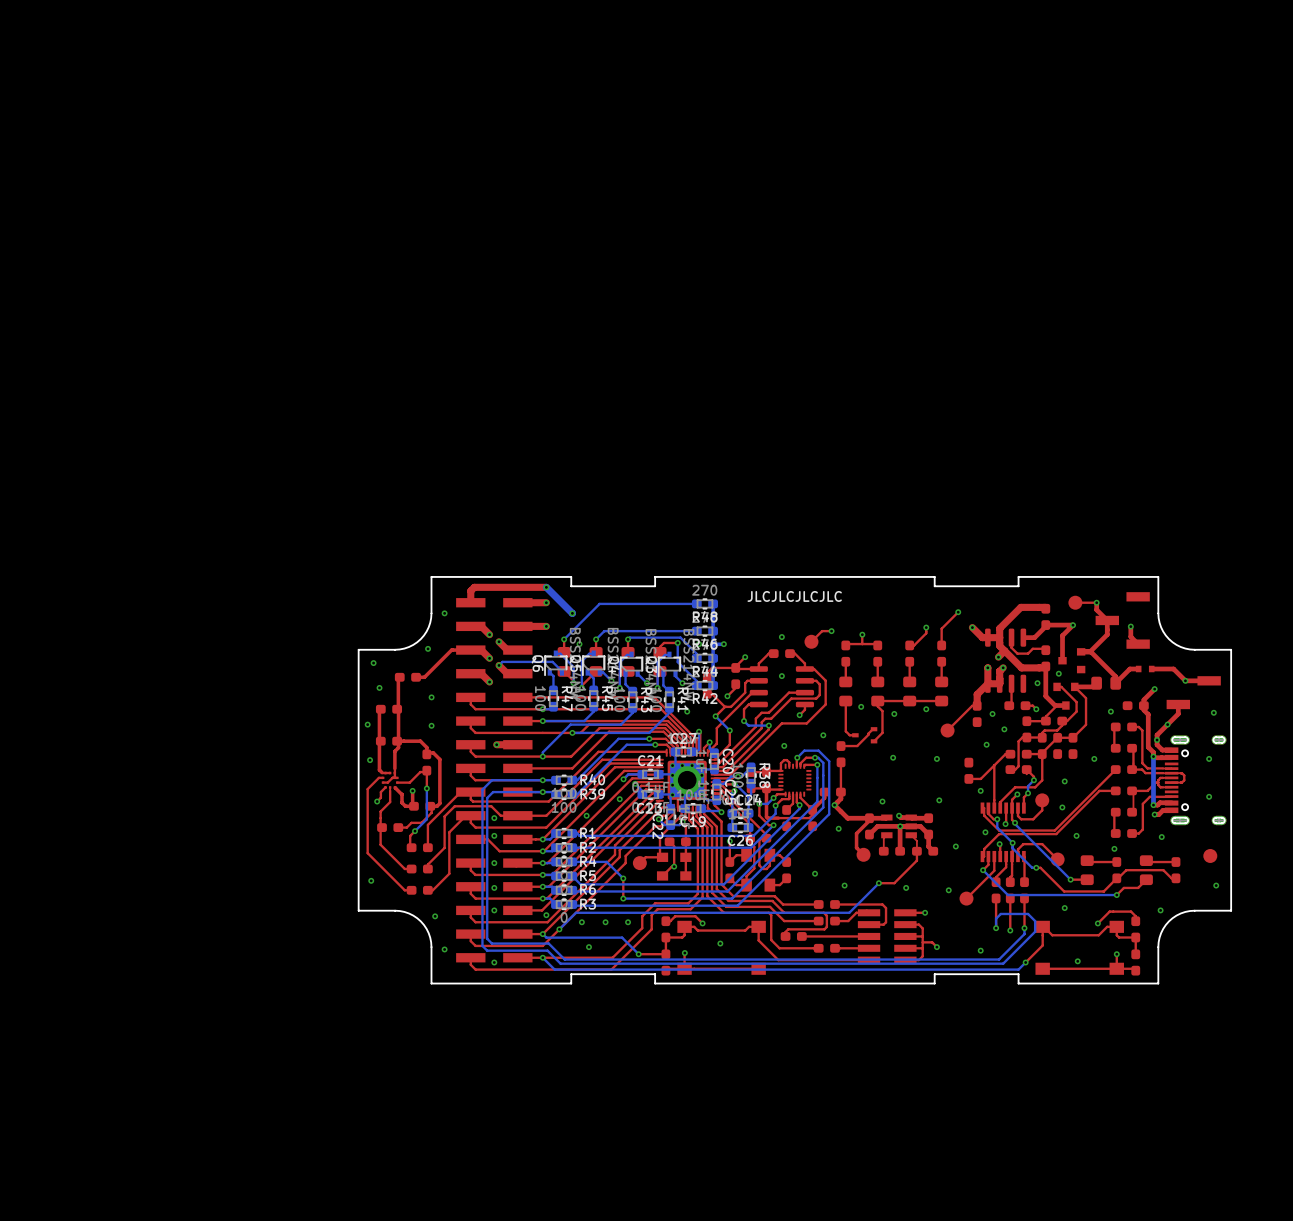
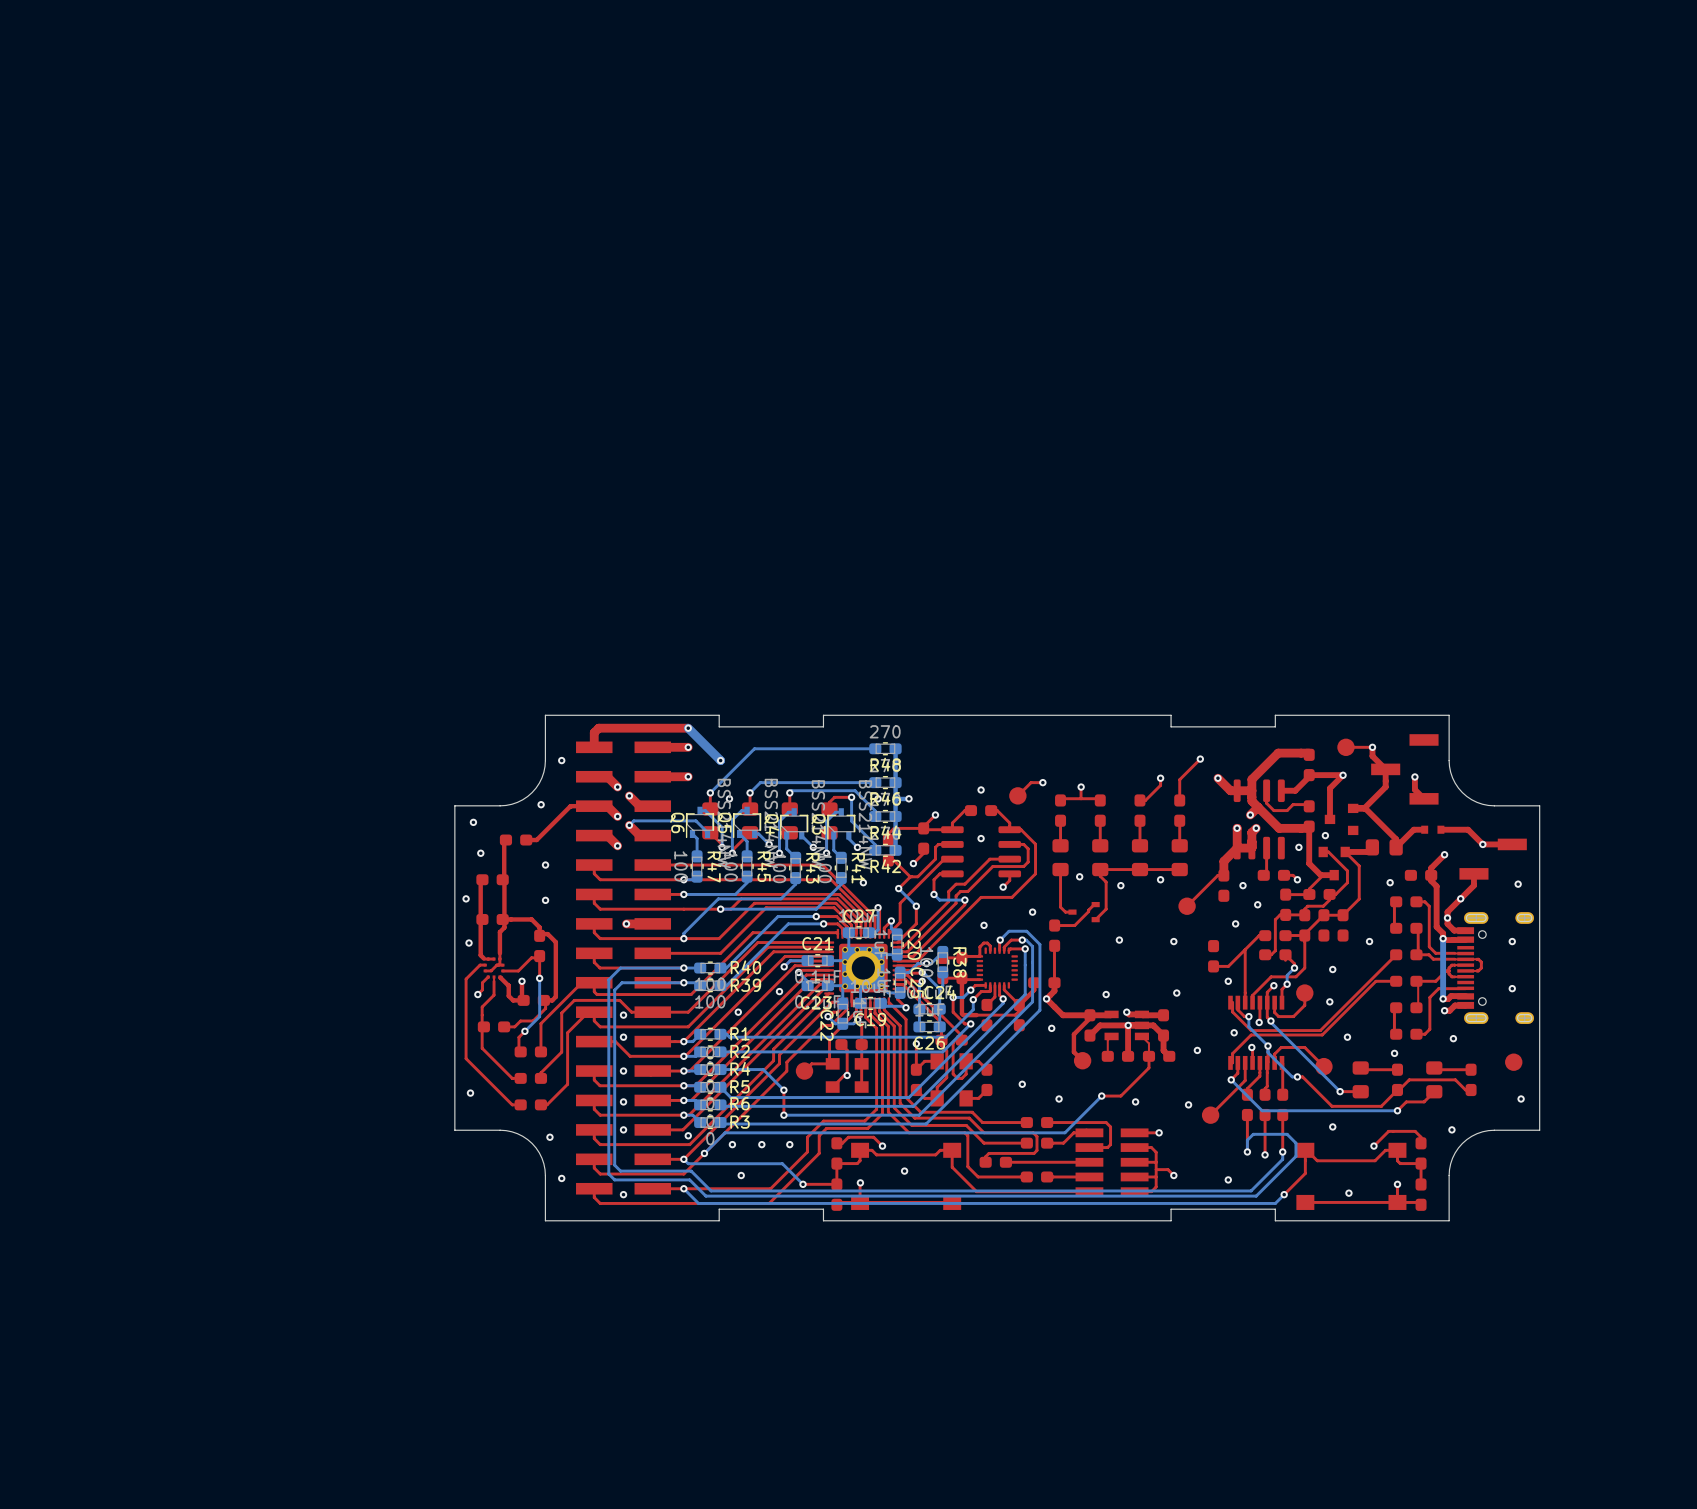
text: JLCJLCJLCJLC (794, 596) -> none

